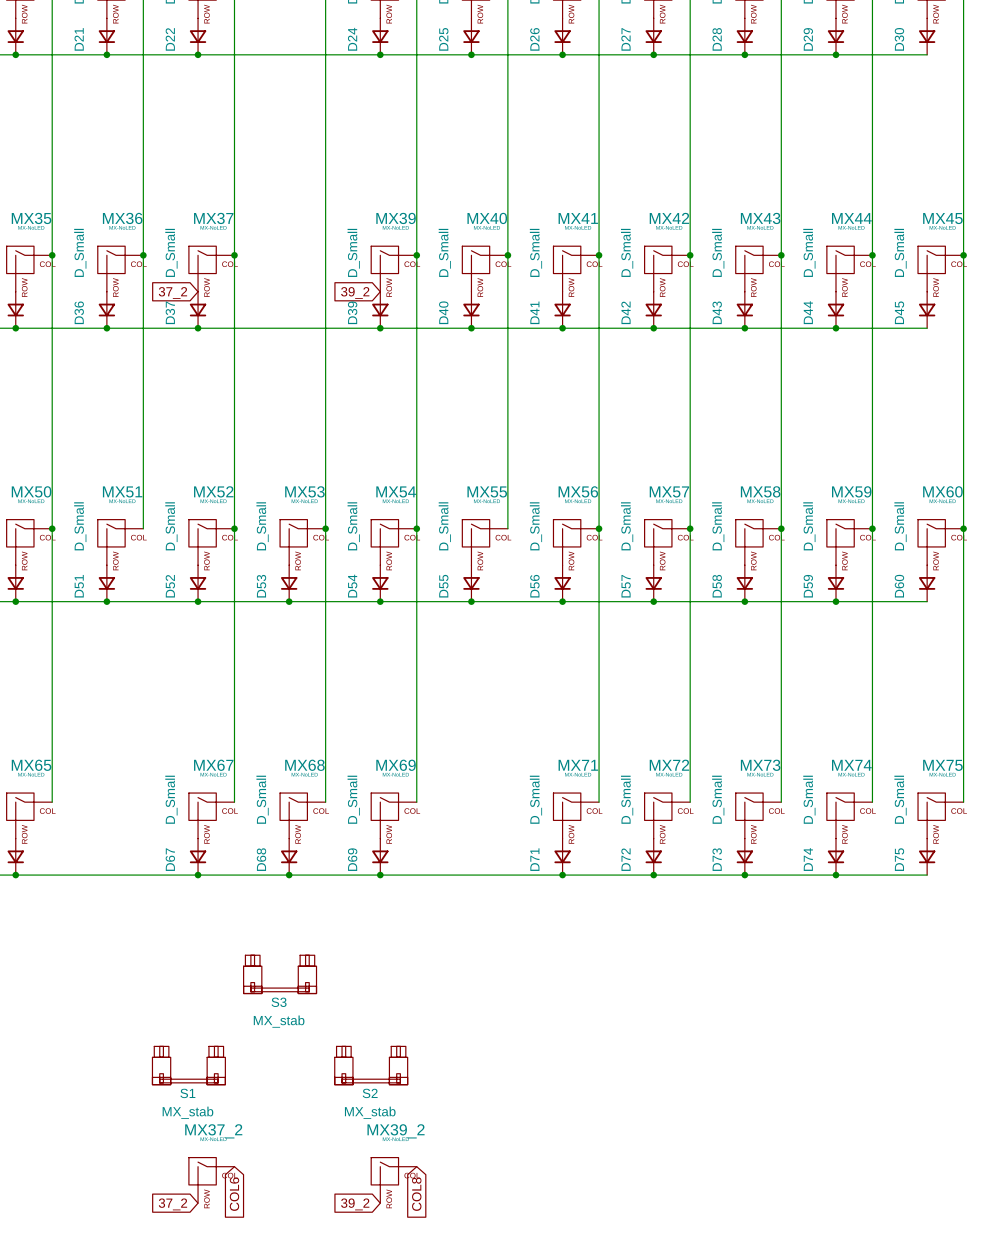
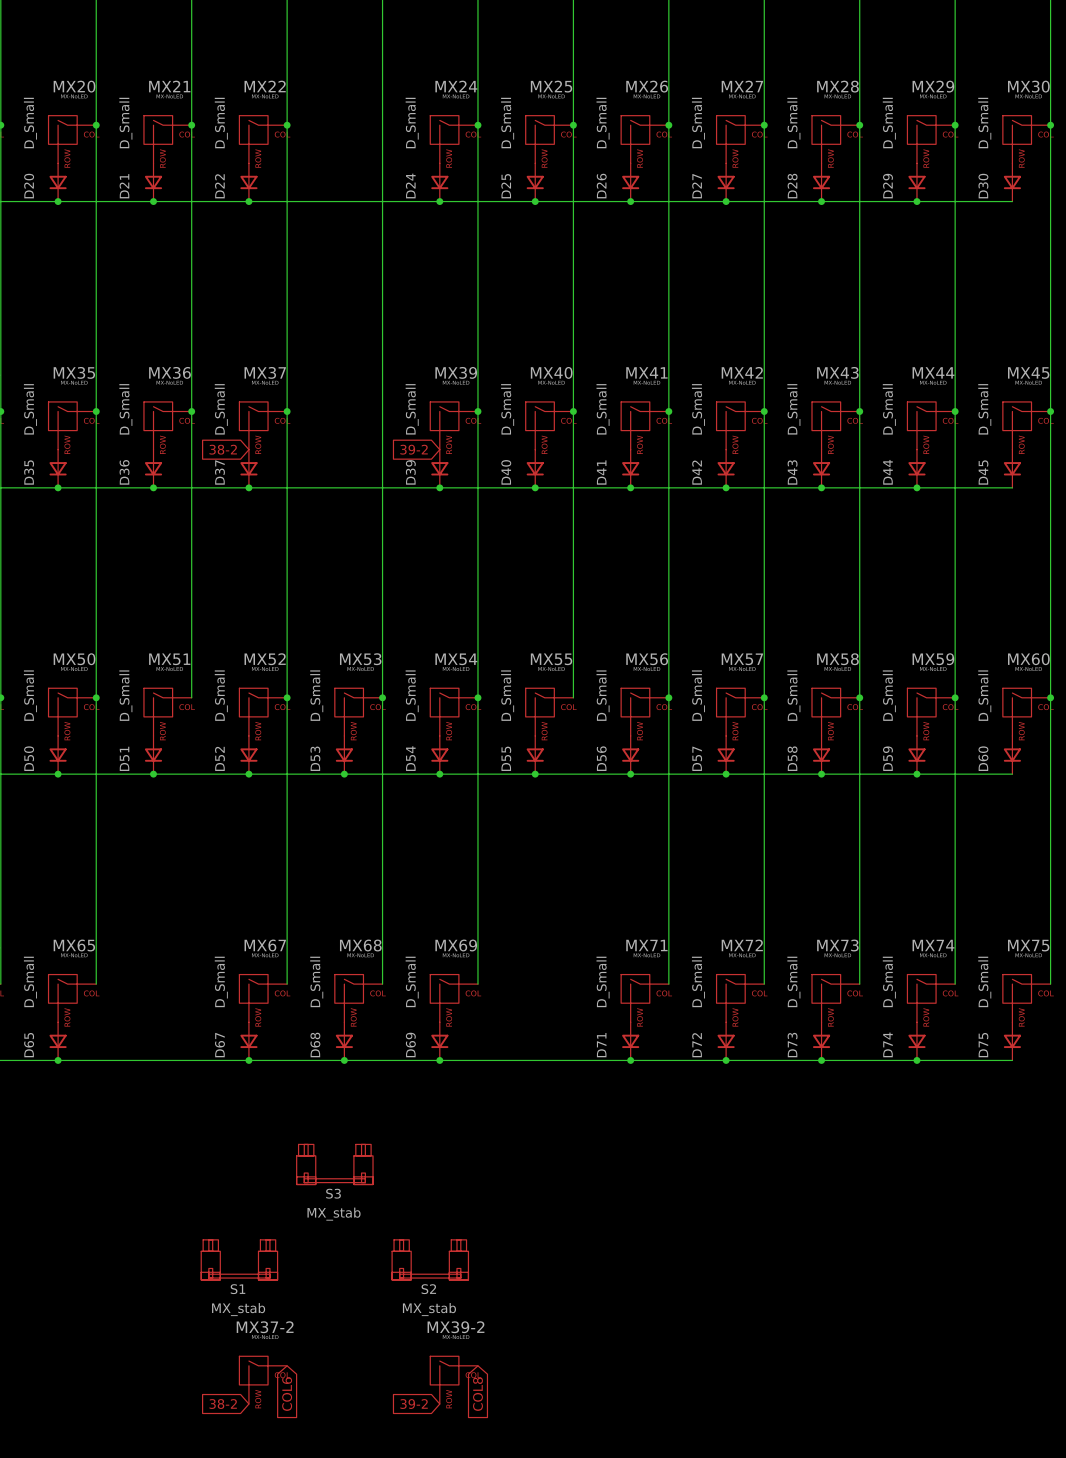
global label: 37_2 (172, 293) -> 38-2 (223, 449)
global label: 39_2 (355, 293) -> 39-2 (414, 449)
MX37_2 name: MX37_2 (213, 1131) -> MX37-2 (265, 1327)
MX39_2 name: MX39_2 (396, 1131) -> MX39-2 (455, 1327)
global label: 37_2 (172, 1204) -> 38-2 (223, 1404)
global label: 39_2 (355, 1204) -> 39-2 (414, 1404)

